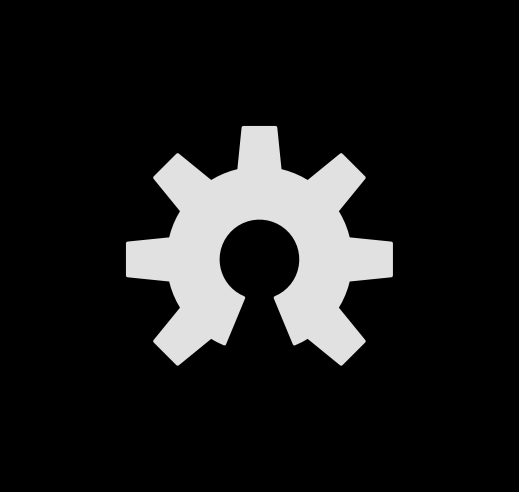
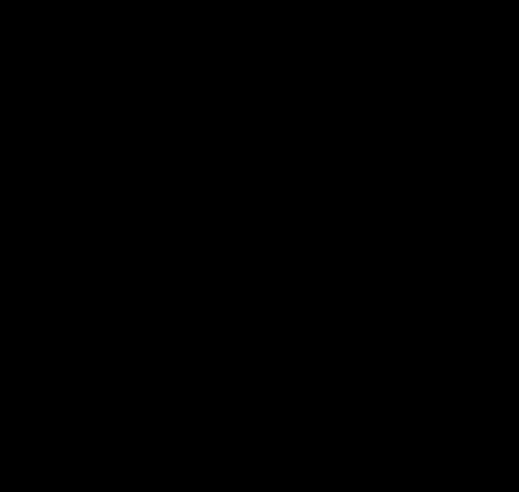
drawing: [125, 125, 393, 366] -> none

